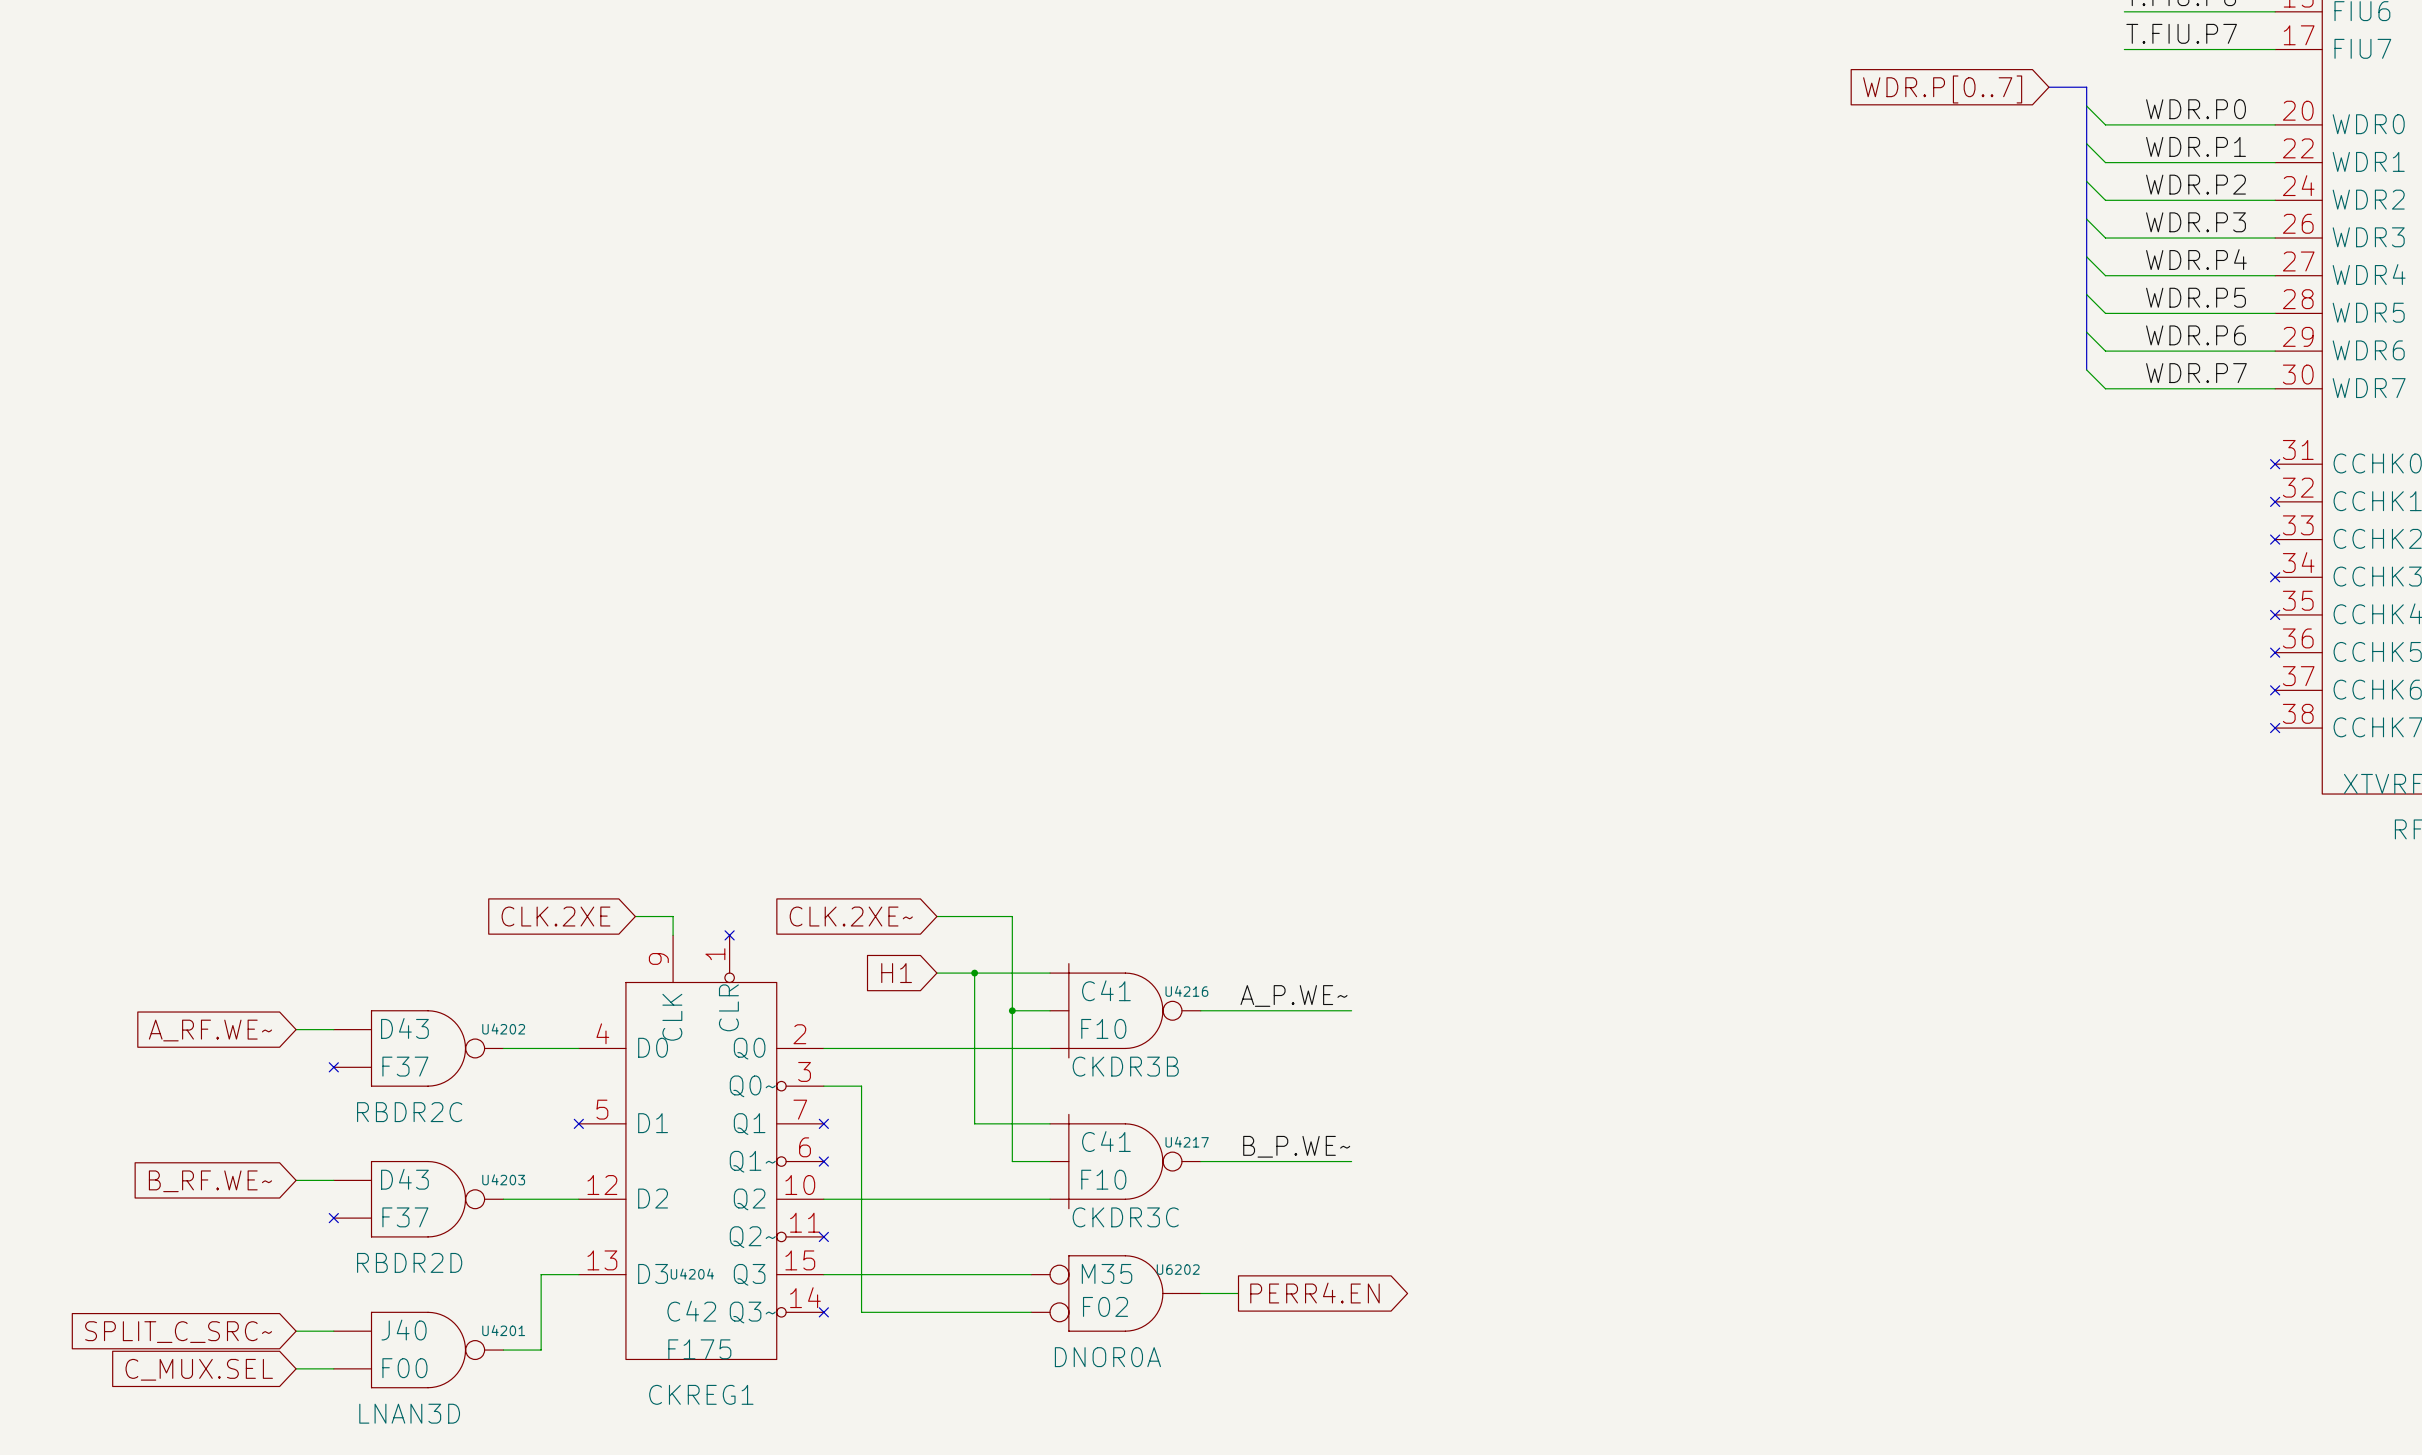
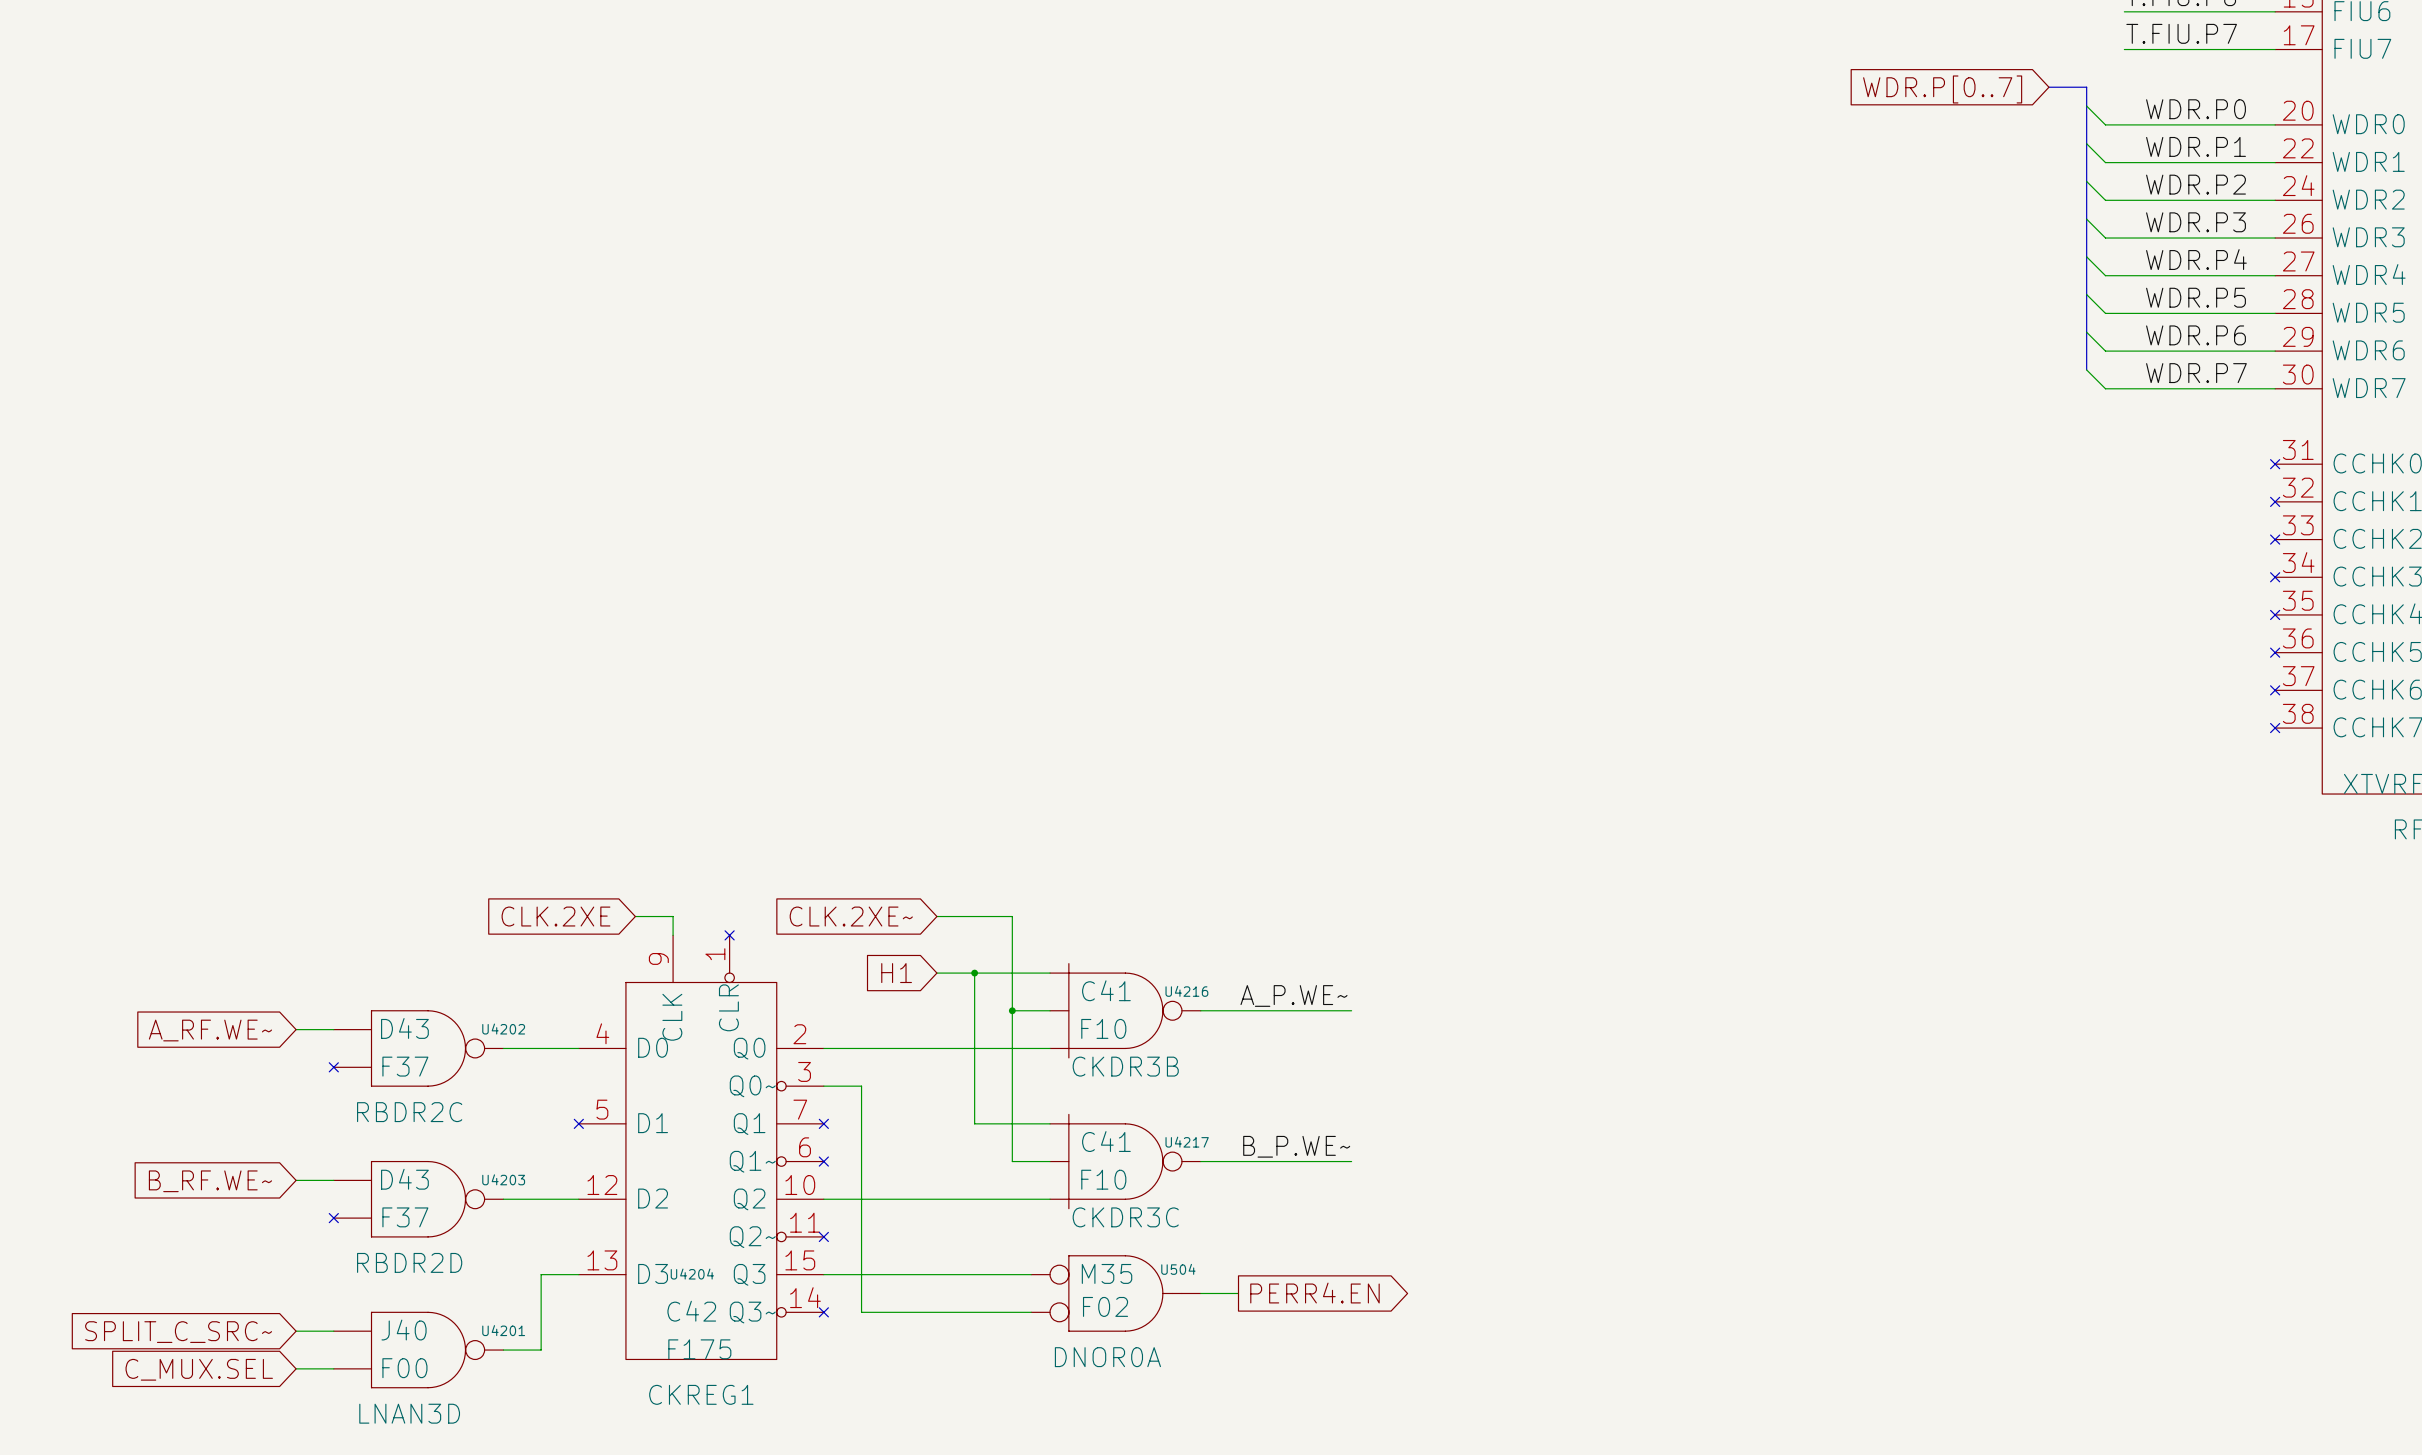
U6202 name: U6202 (1178, 1269) -> U504 (1178, 1269)

